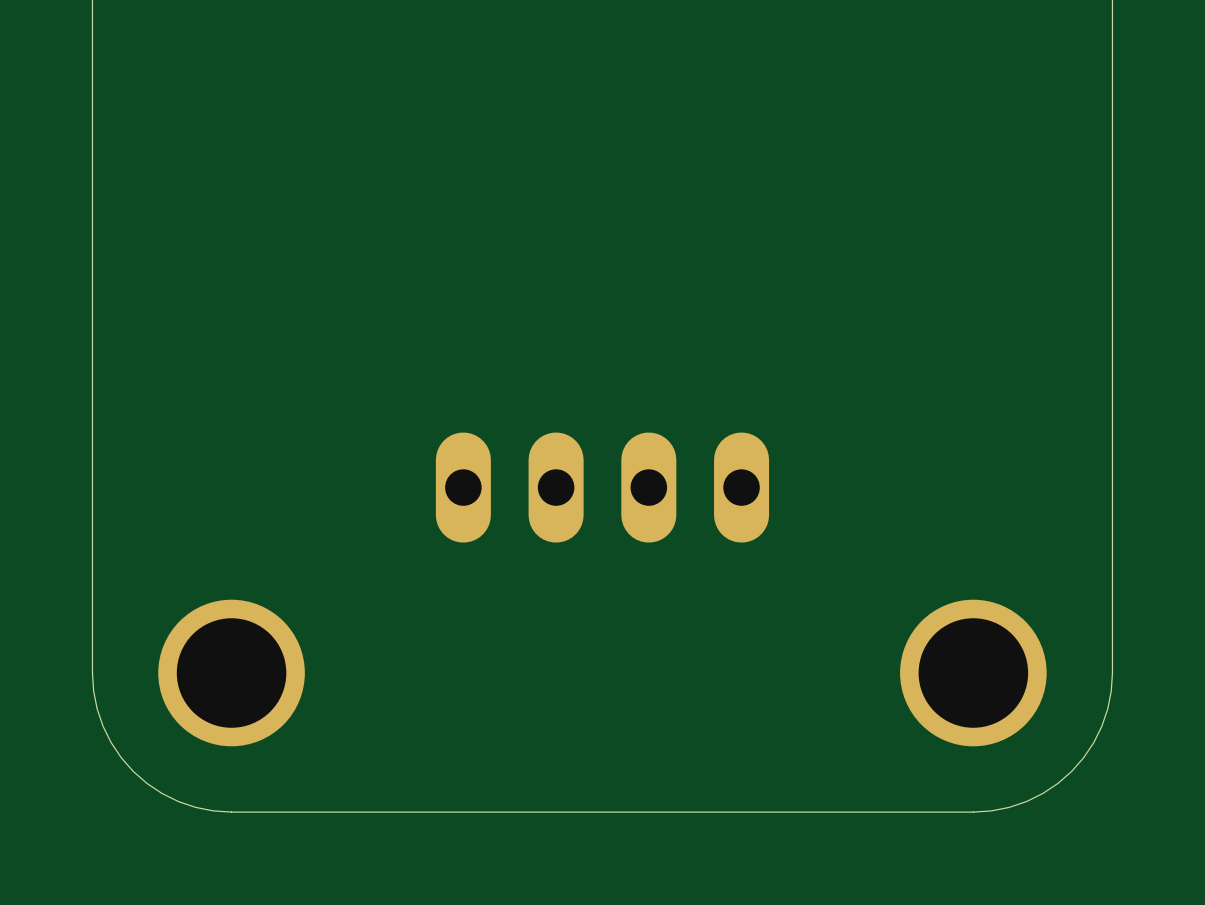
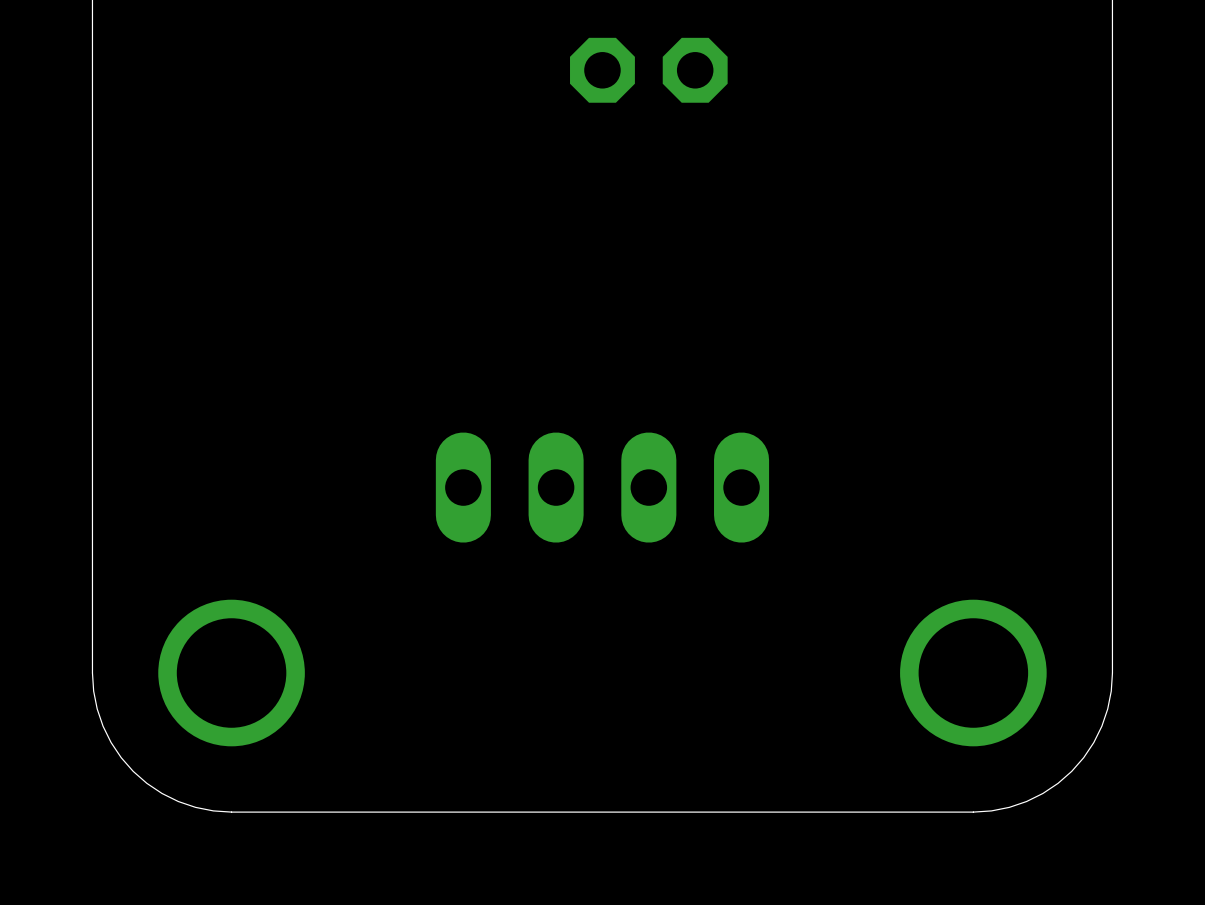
part: none -> (648, 70)

